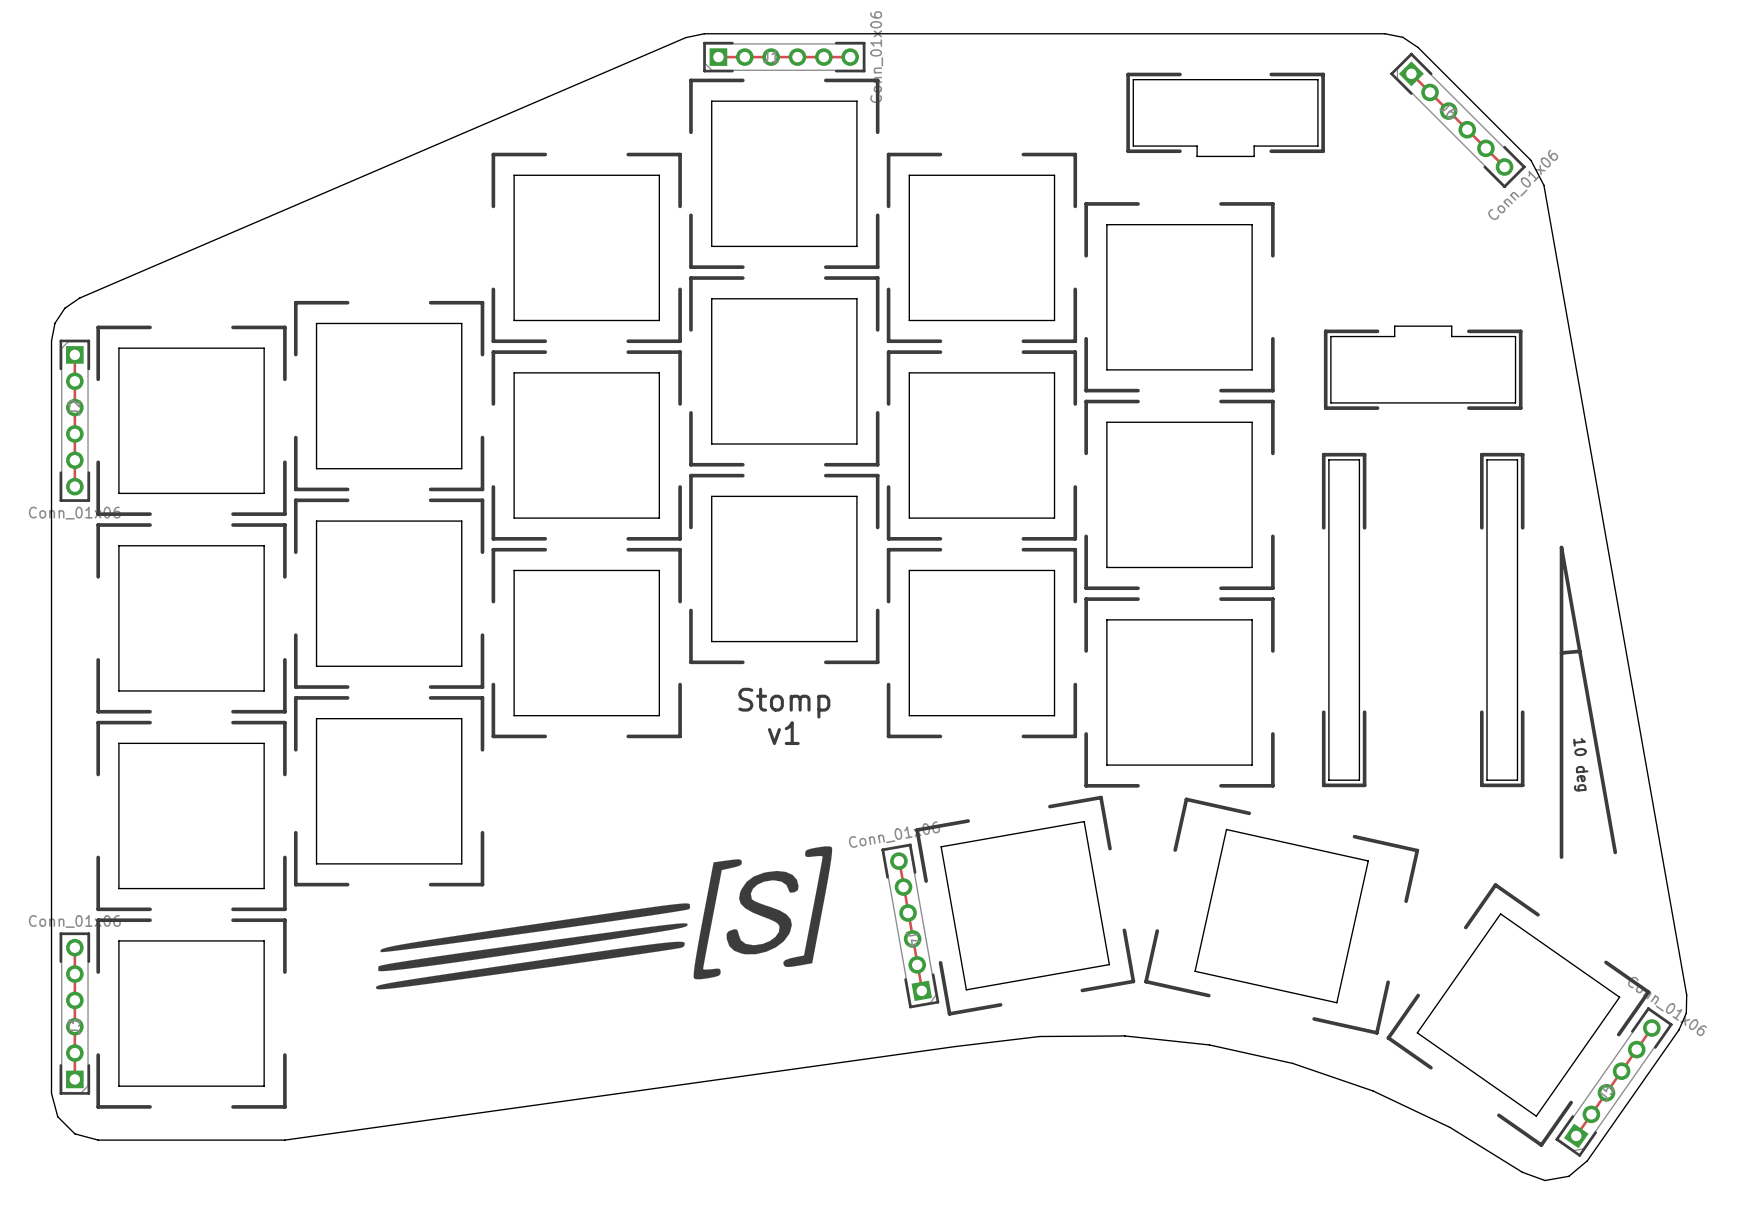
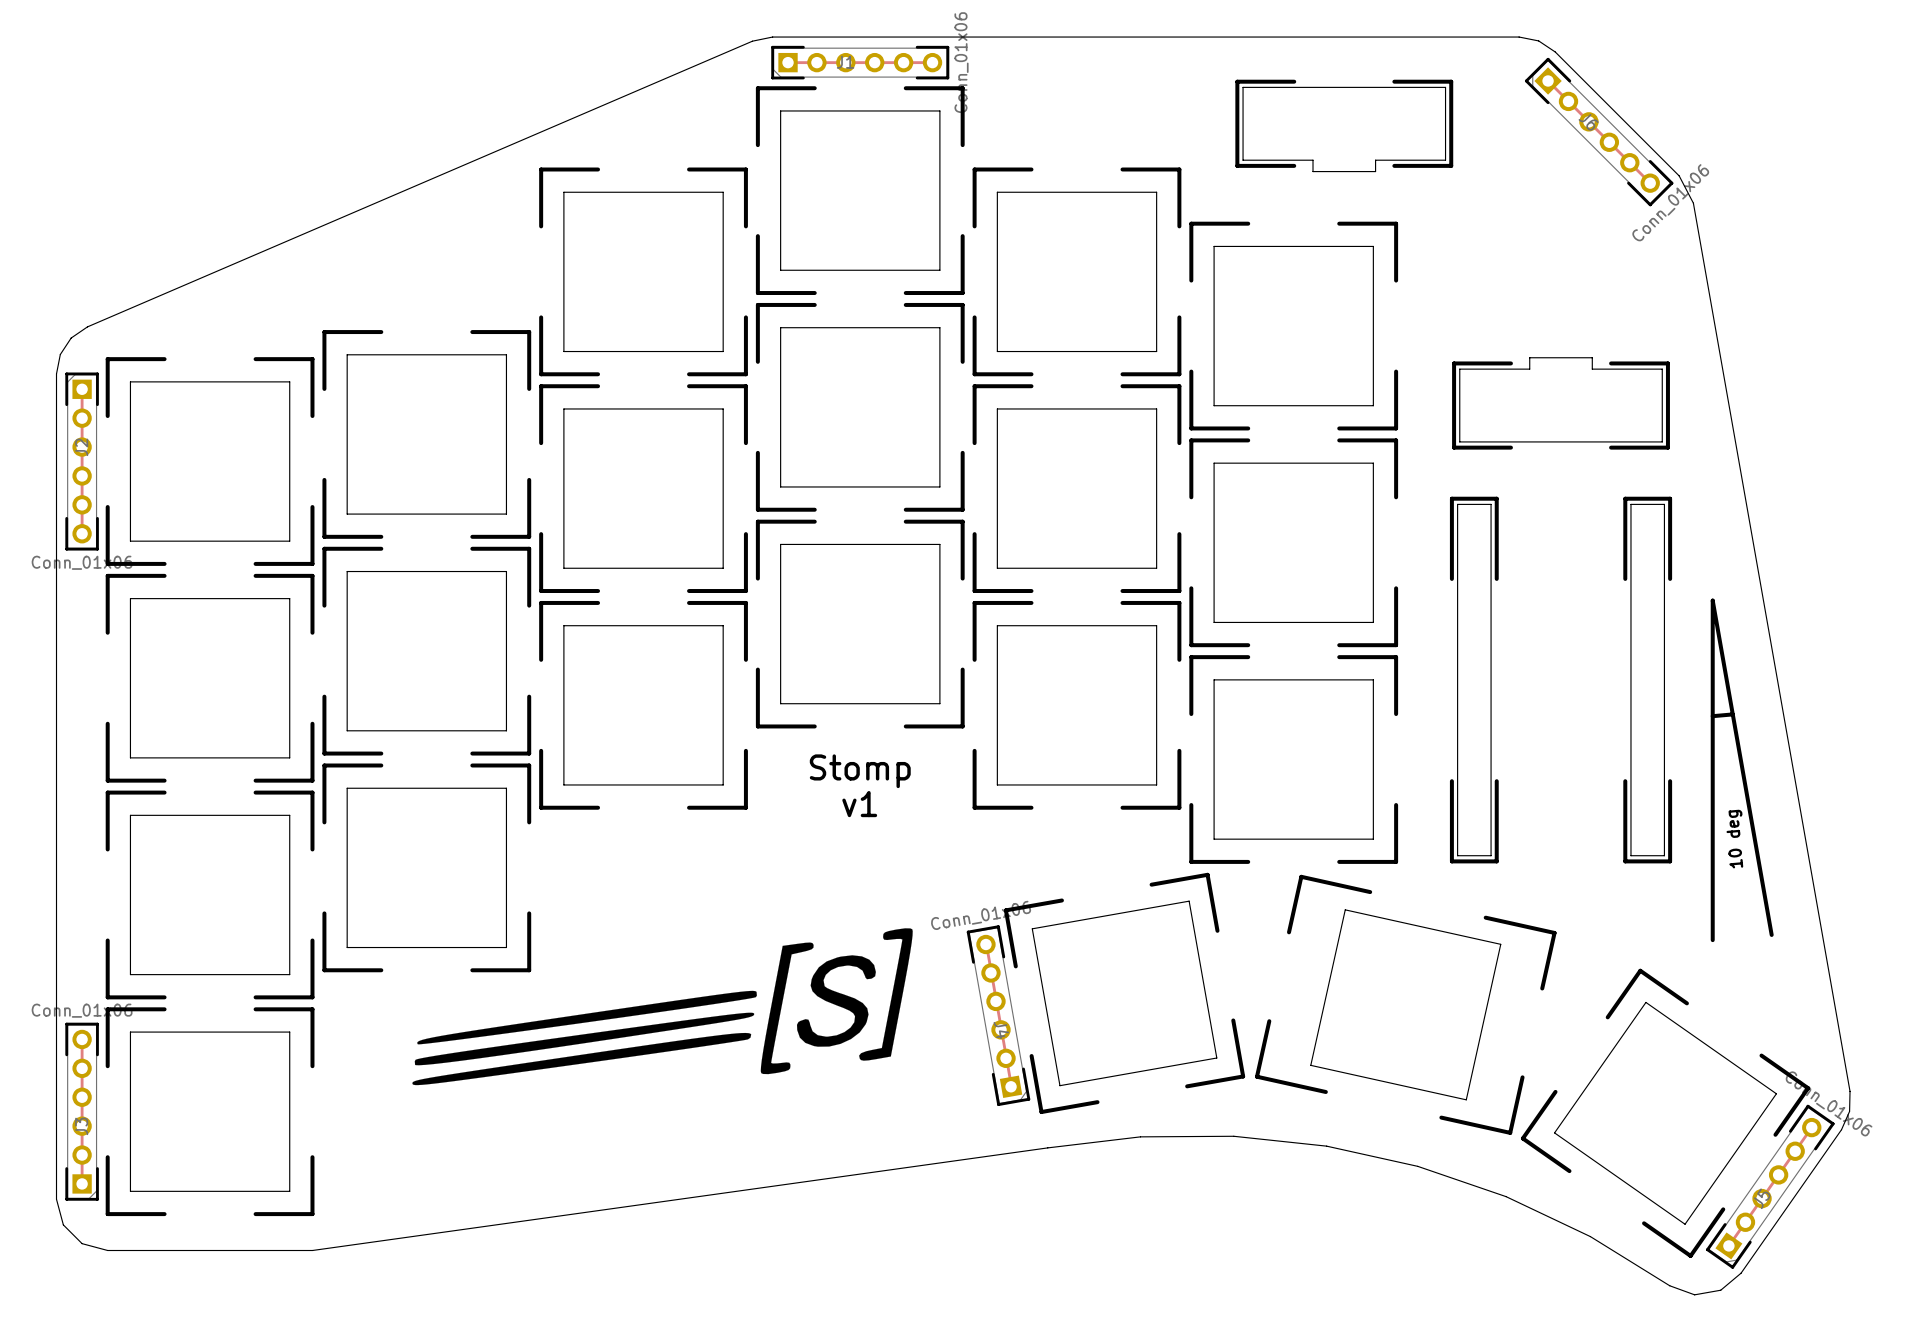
text rotation: 0° (1580, 764) -> 180° (1734, 839)

